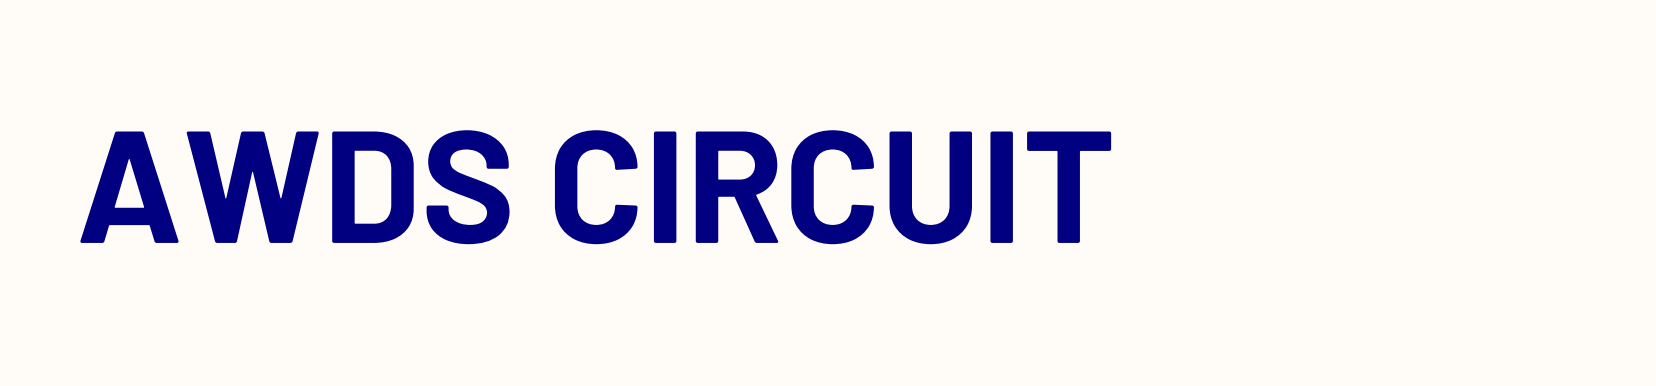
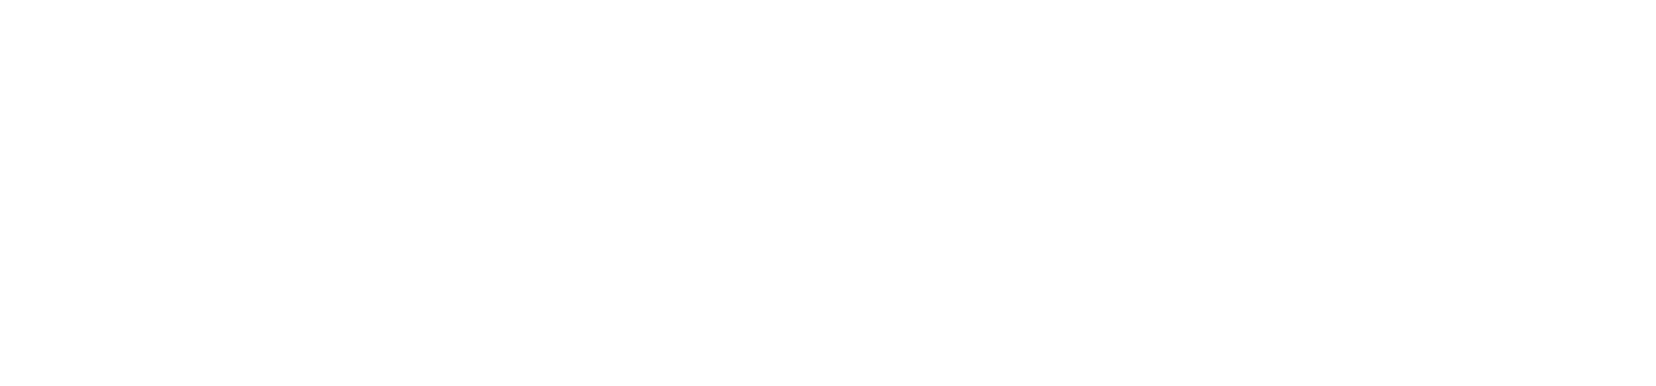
text: AWDS CIRCUIT (595, 187) -> none

